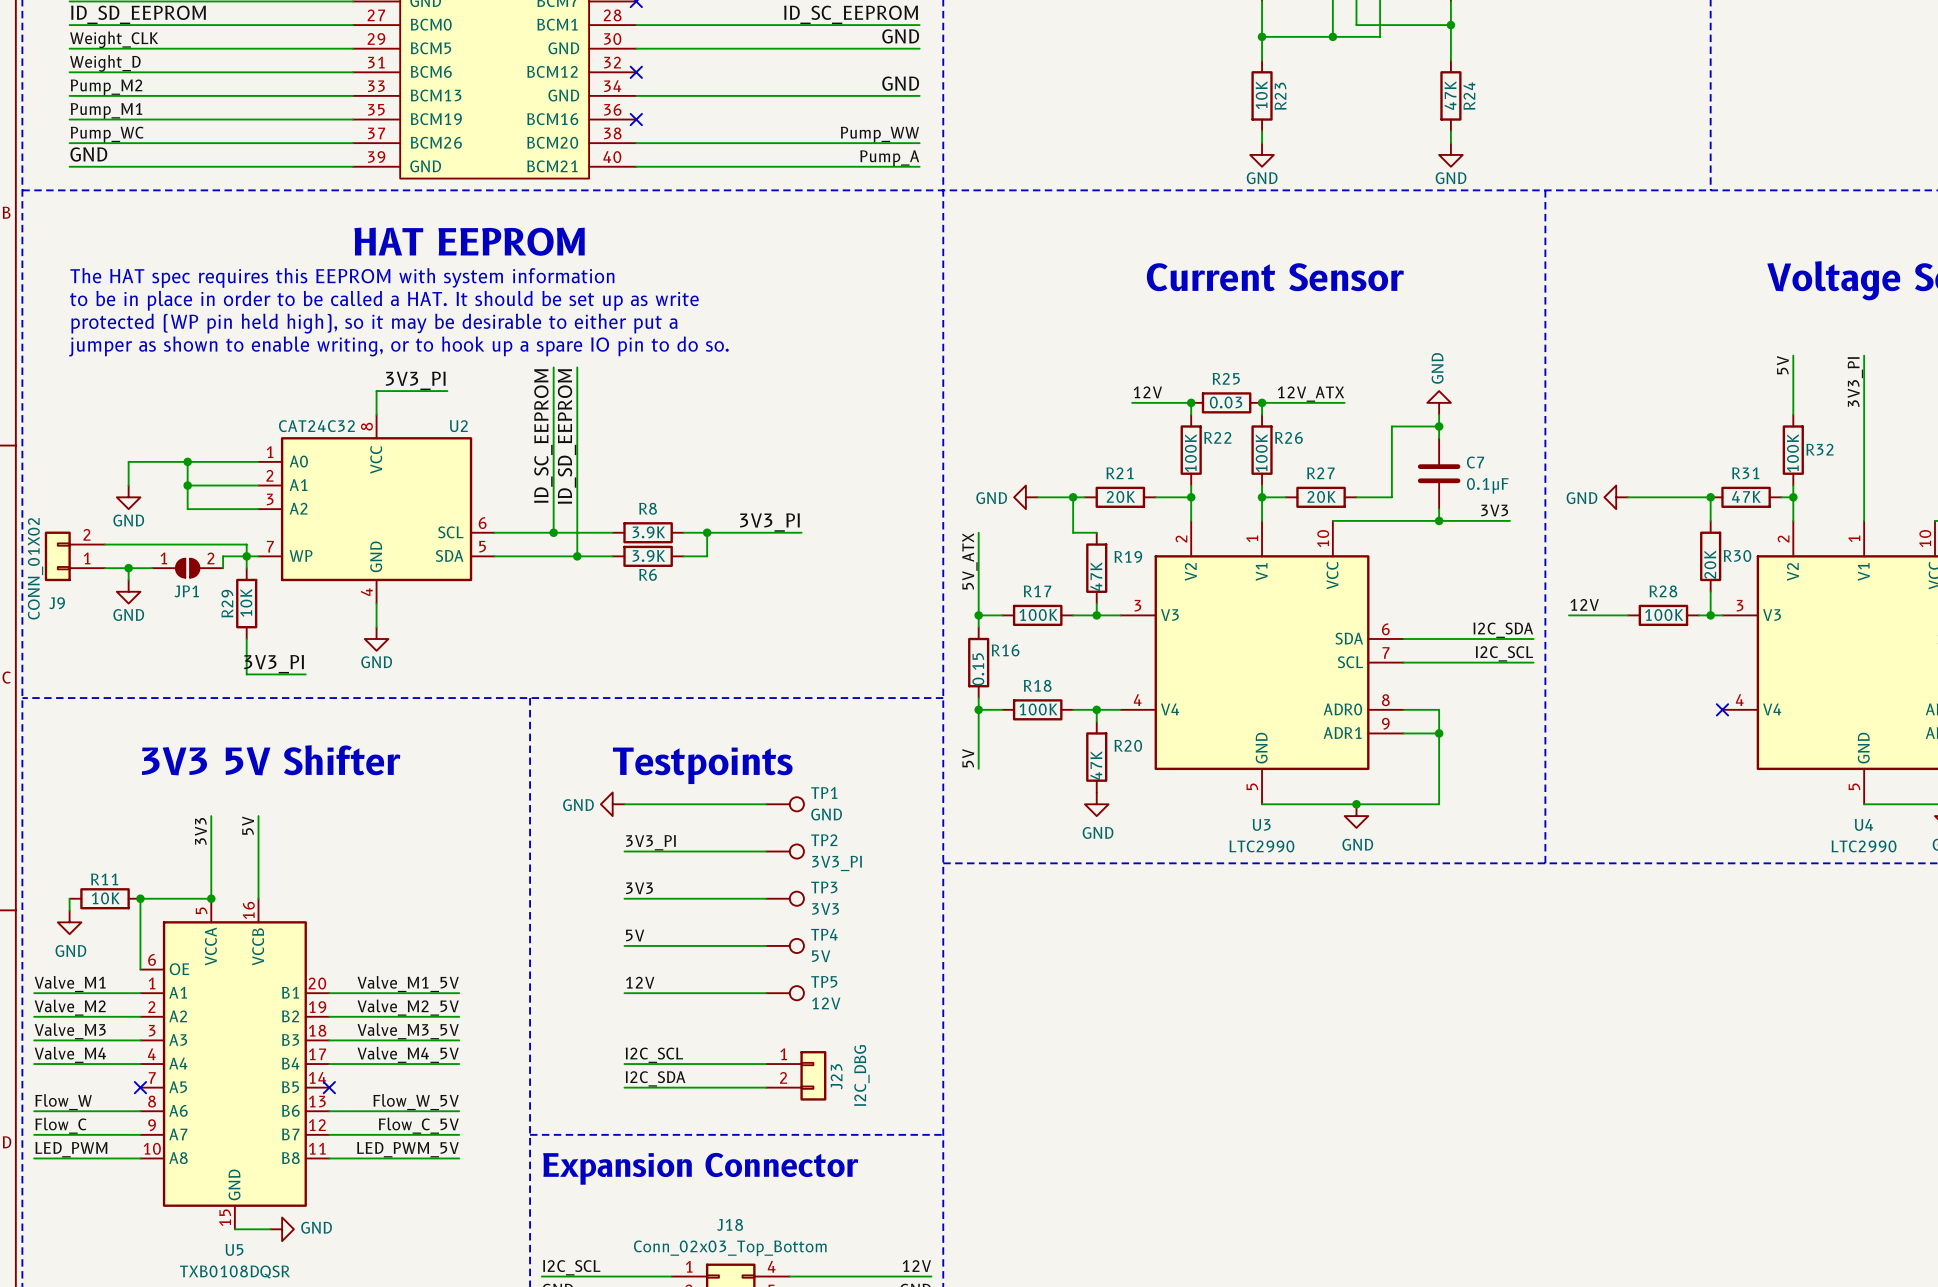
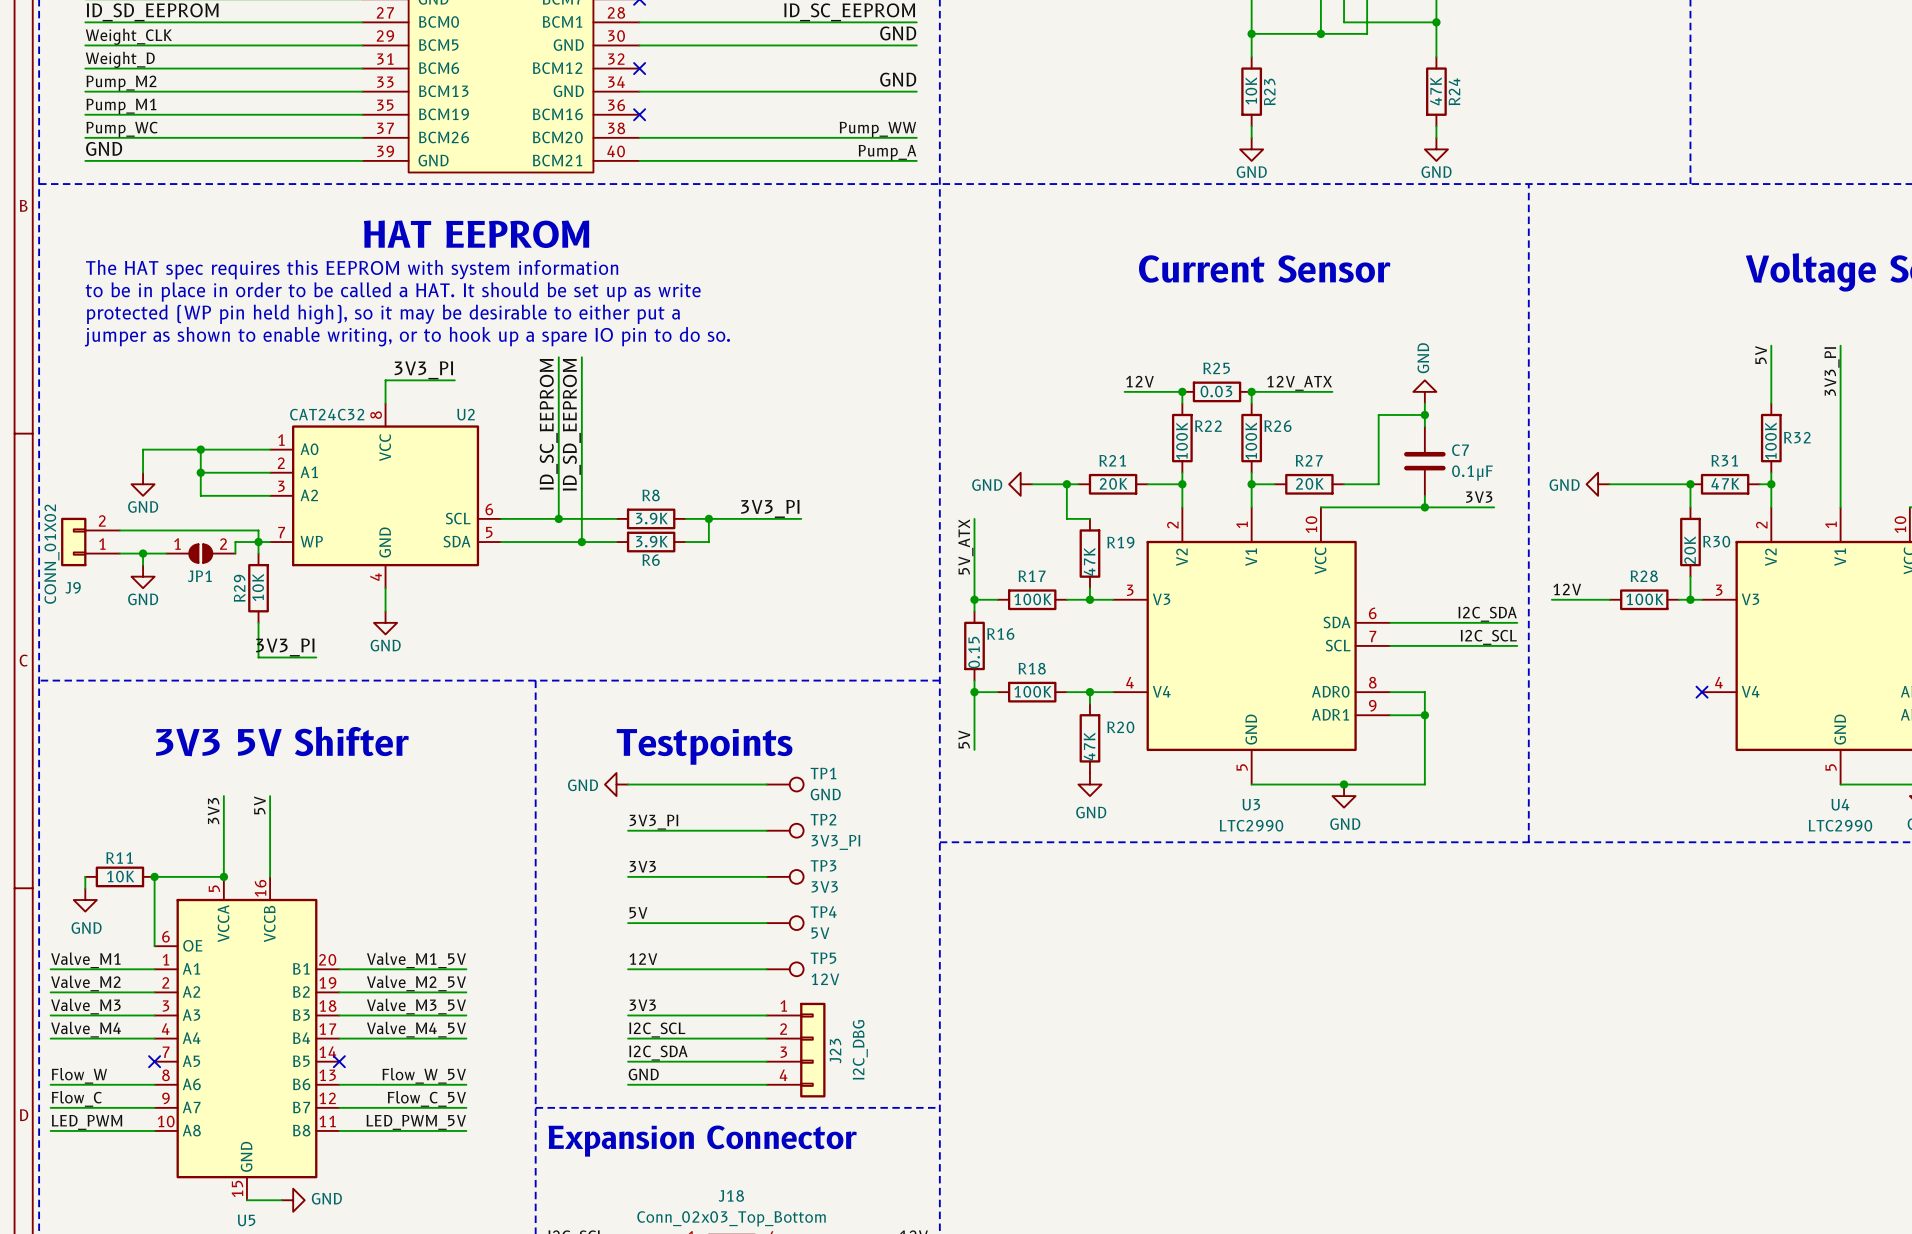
label: none -> 3V3 (642, 1005)
wire: none -> (628, 1015) (766, 1015)
J23 symbol: [766, 1051, 827, 1101] -> [766, 1002, 826, 1098]
label: none -> GND (643, 1074)
wire: none -> (628, 1084) (766, 1084)

